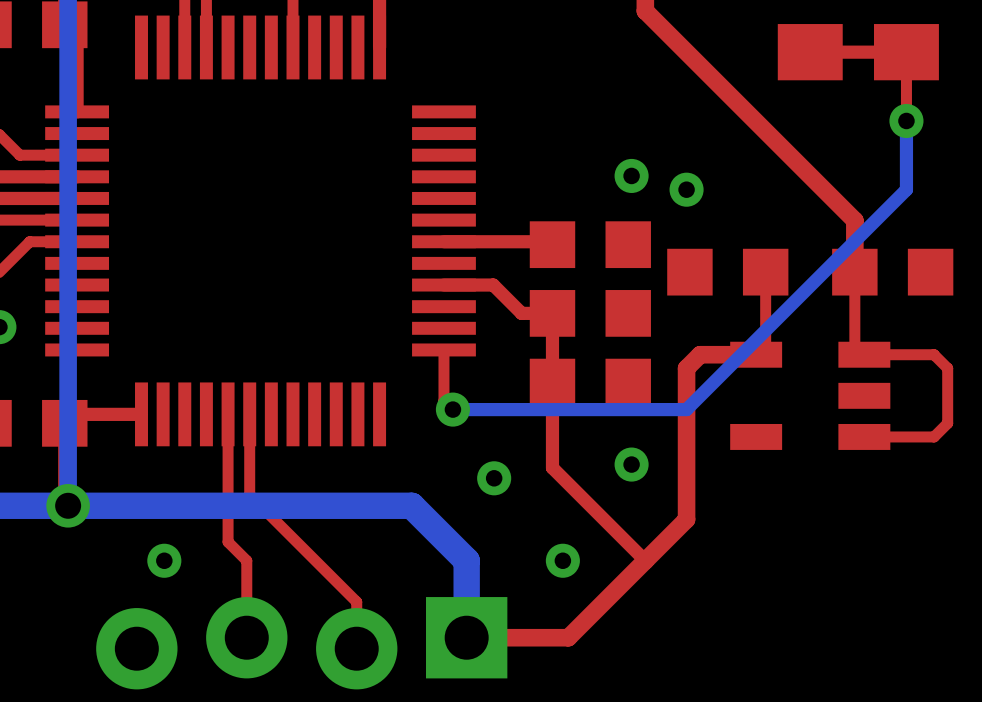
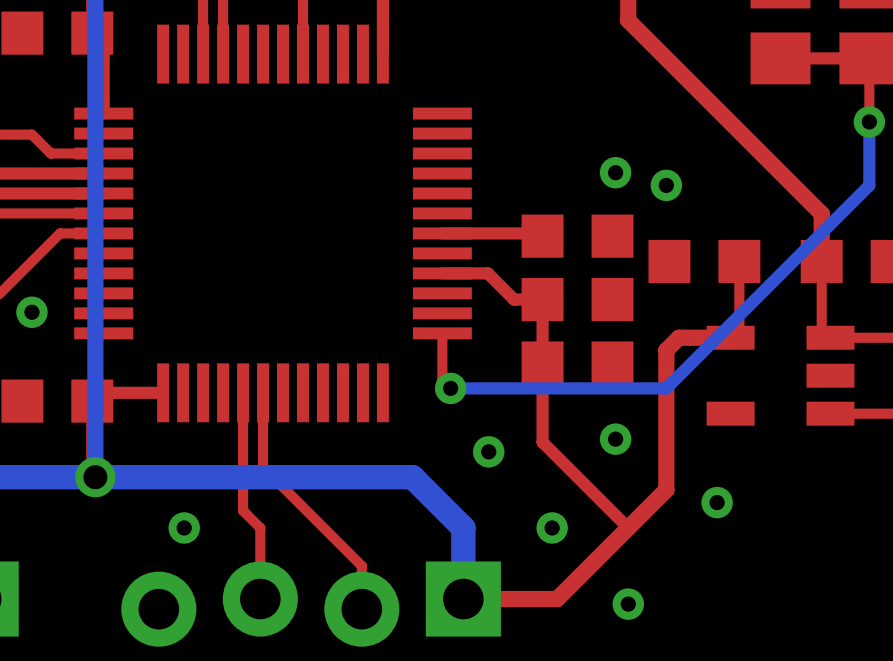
via: none -> (717, 502)
via: none -> (628, 604)

